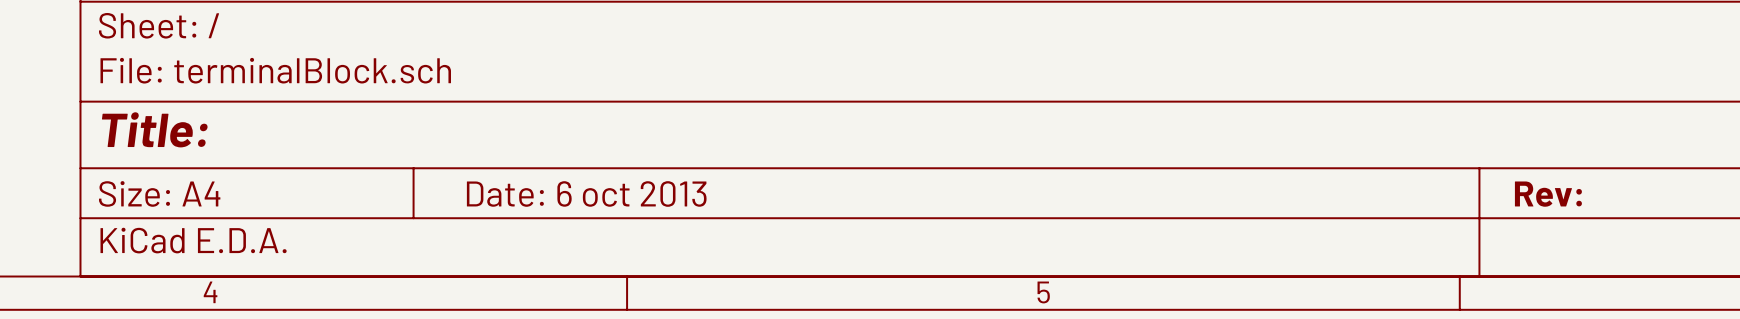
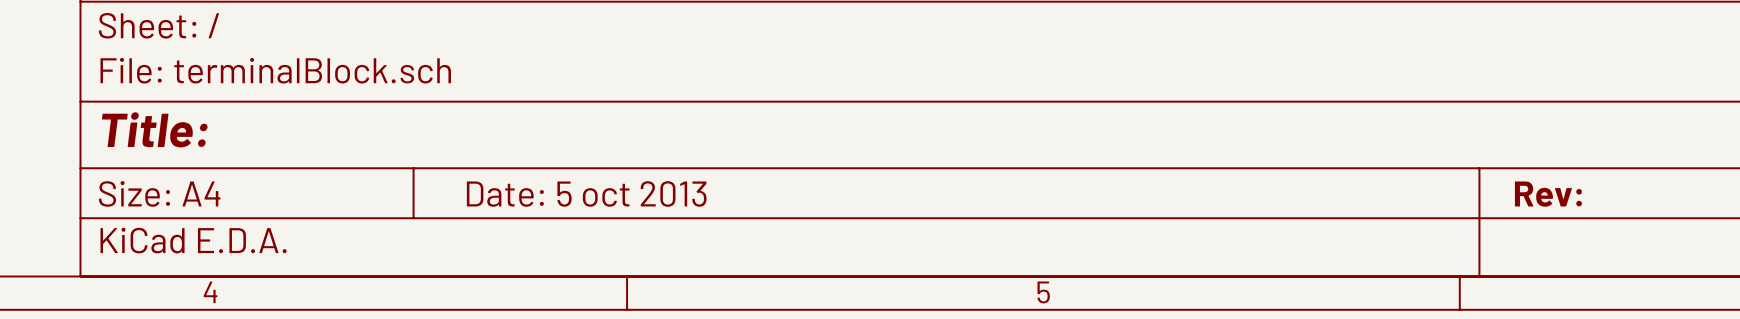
title block: Date: 6 oct 2013 (586, 193) -> Date: 5 oct 2013 (586, 193)

